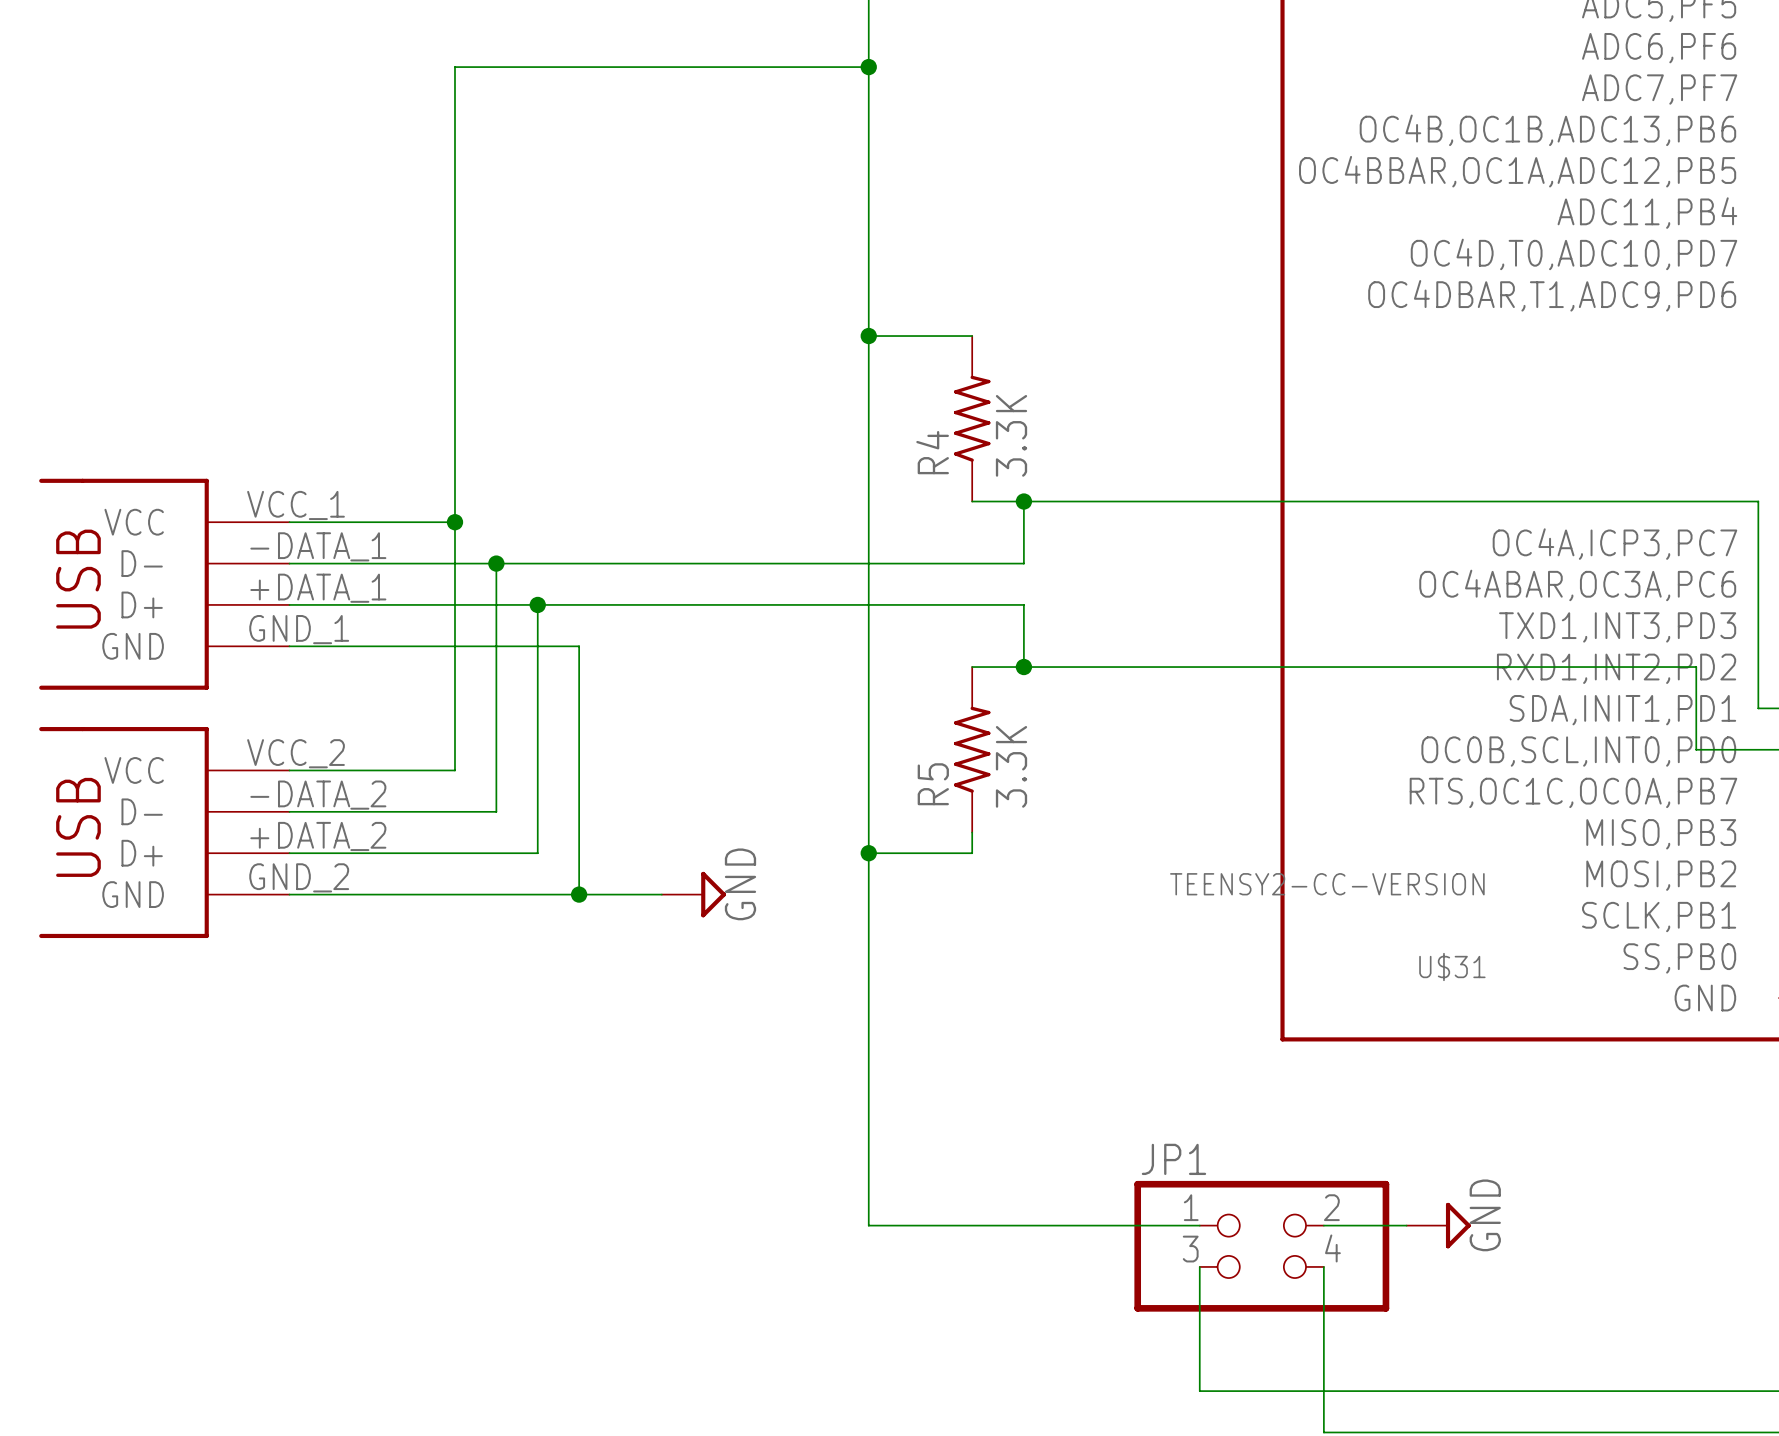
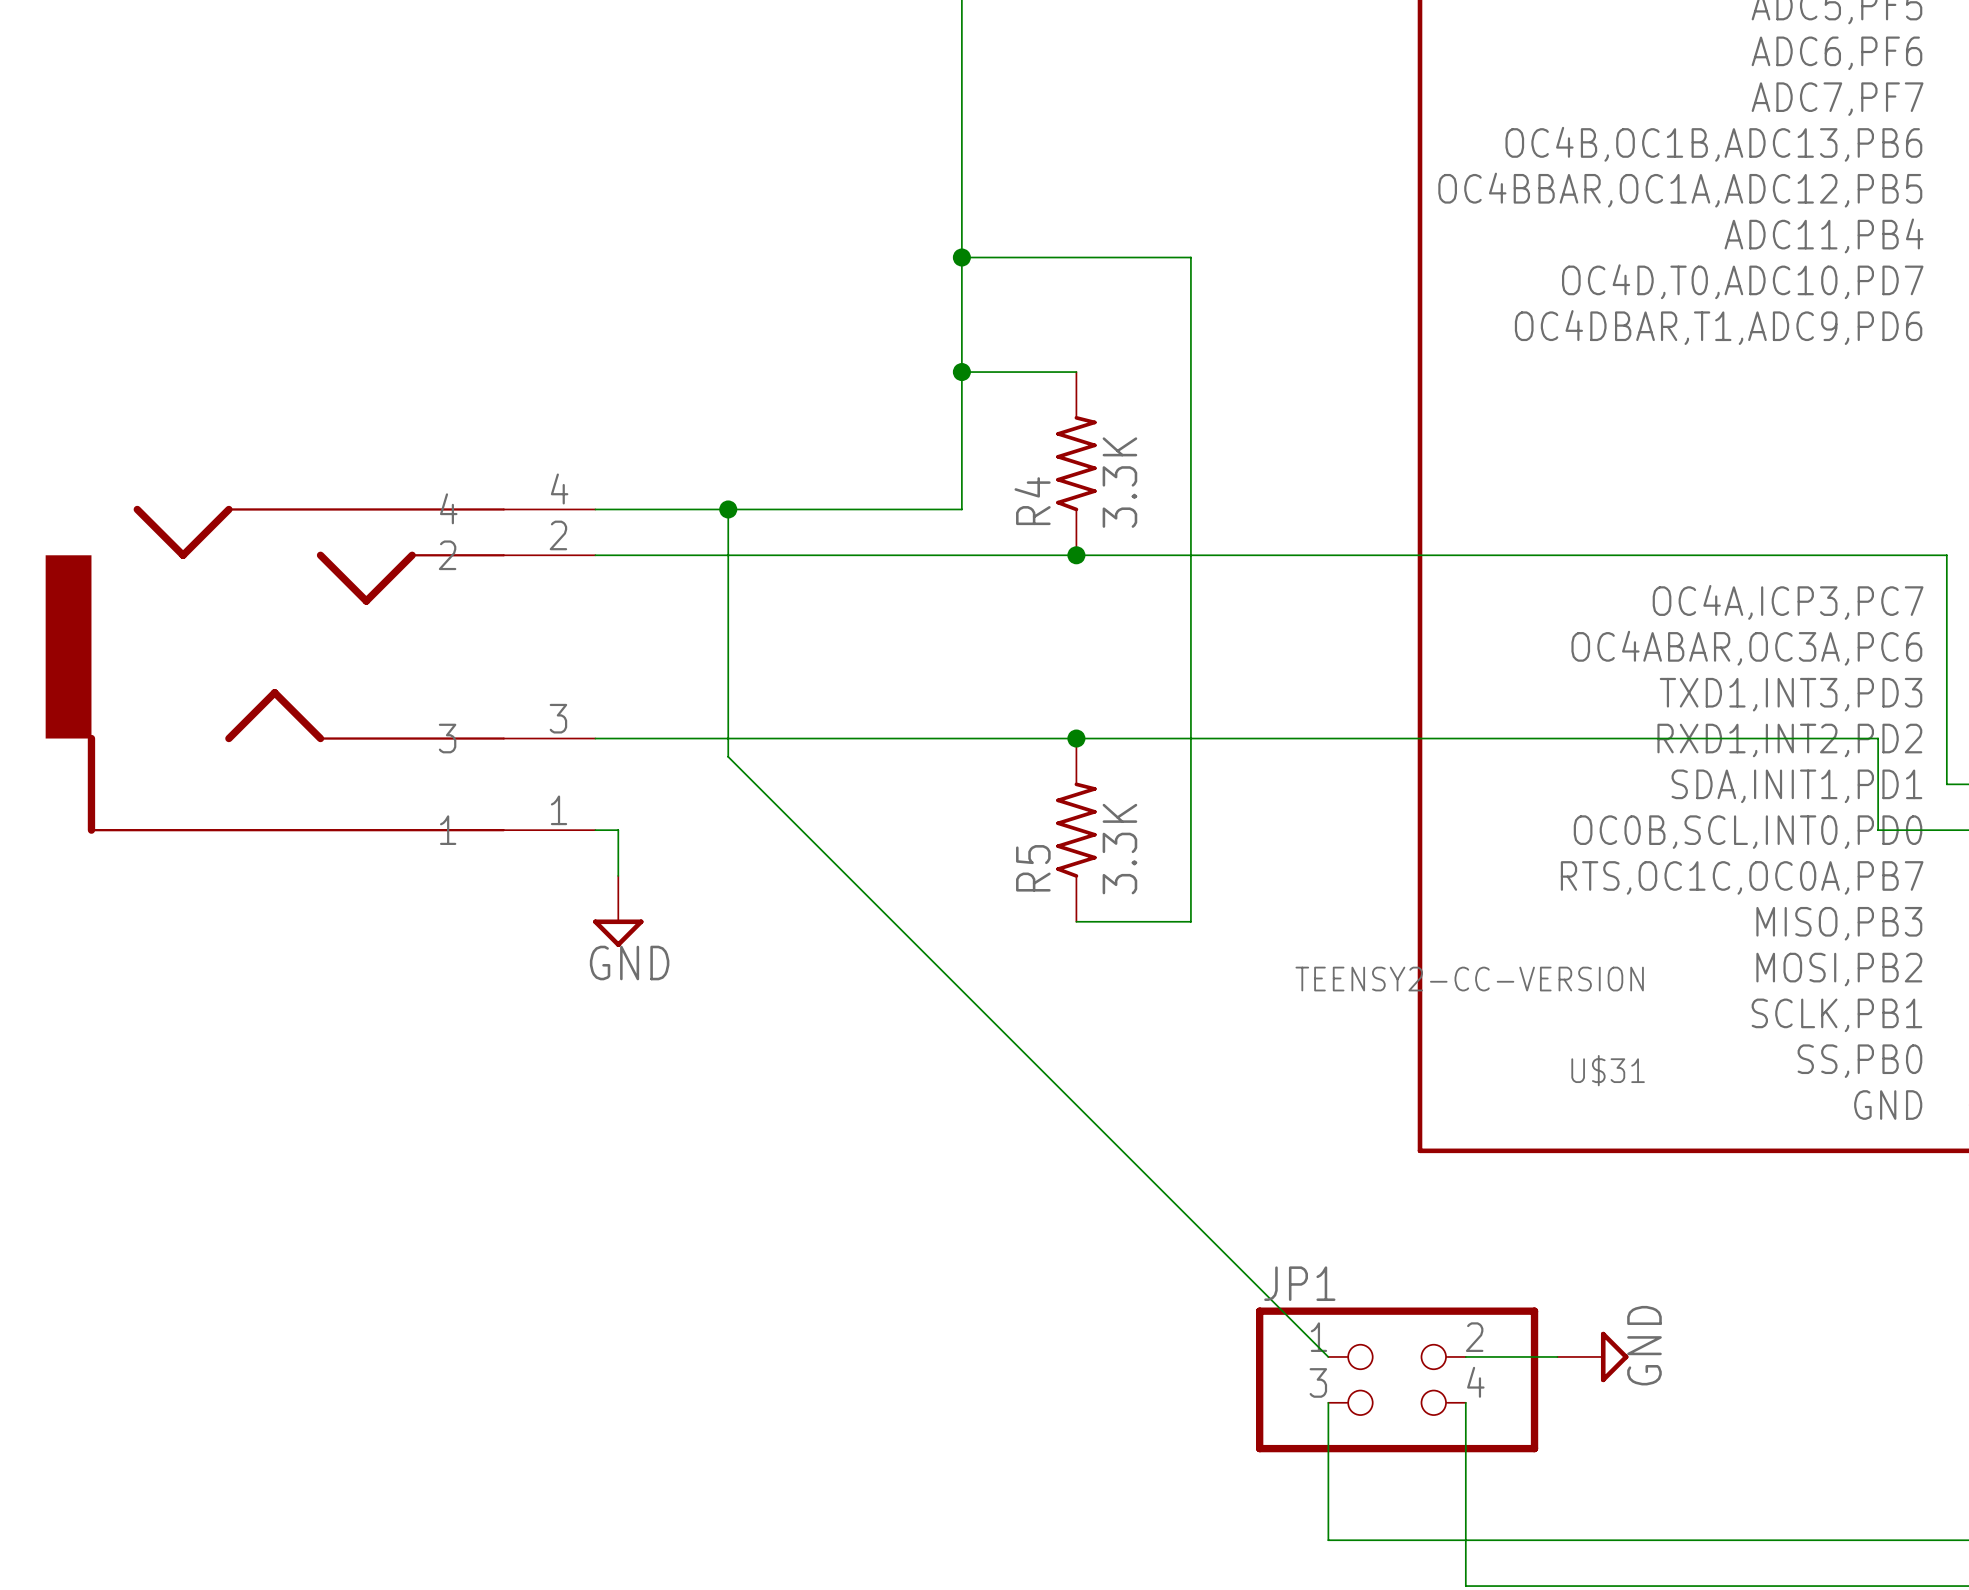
wire: (868, 67) (454, 67) (454, 770) (289, 770) -> none
junction: (868, 67) -> none
junction: none -> (961, 257)
wire: none -> (595, 509) (961, 509)
junction: none -> (728, 509)
wire: (868, 460) (868, 1225) (1199, 1225) -> (728, 509) (728, 756) (1328, 1356)
wire: none -> (595, 555) (1076, 555)
wire: (1023, 501) (1023, 563) (289, 563) -> none
junction position: (1023, 501) -> (1076, 555)
wire: (289, 522) (454, 522) -> none
junction: (454, 522) -> none
wire: (496, 563) (496, 811) (289, 811) -> none
junction: (496, 563) -> none
part: (164, 584) -> none
wire: (289, 604) (1023, 604) (1023, 667) -> none
part: none -> (320, 669)
wire: (537, 604) (537, 853) (289, 853) -> none
junction: (537, 604) -> none
wire: (289, 646) (579, 646) (579, 894) -> none
wire: none -> (595, 738) (1076, 738)
junction position: (1023, 667) -> (1076, 738)
wire: none -> (595, 830) (618, 830) (618, 875)
part: (164, 832) -> none
wire: (972, 832) (972, 853) (868, 853) -> (1076, 921) (1190, 921) (1190, 257) (961, 257)
junction: (868, 853) -> none
wire: (289, 894) (661, 894) -> none
junction: (579, 894) -> none
power symbol position: GND (693, 894) -> GND (618, 911)
power symbol rotation: 0° (713, 894) -> 90° clockwise (618, 933)

